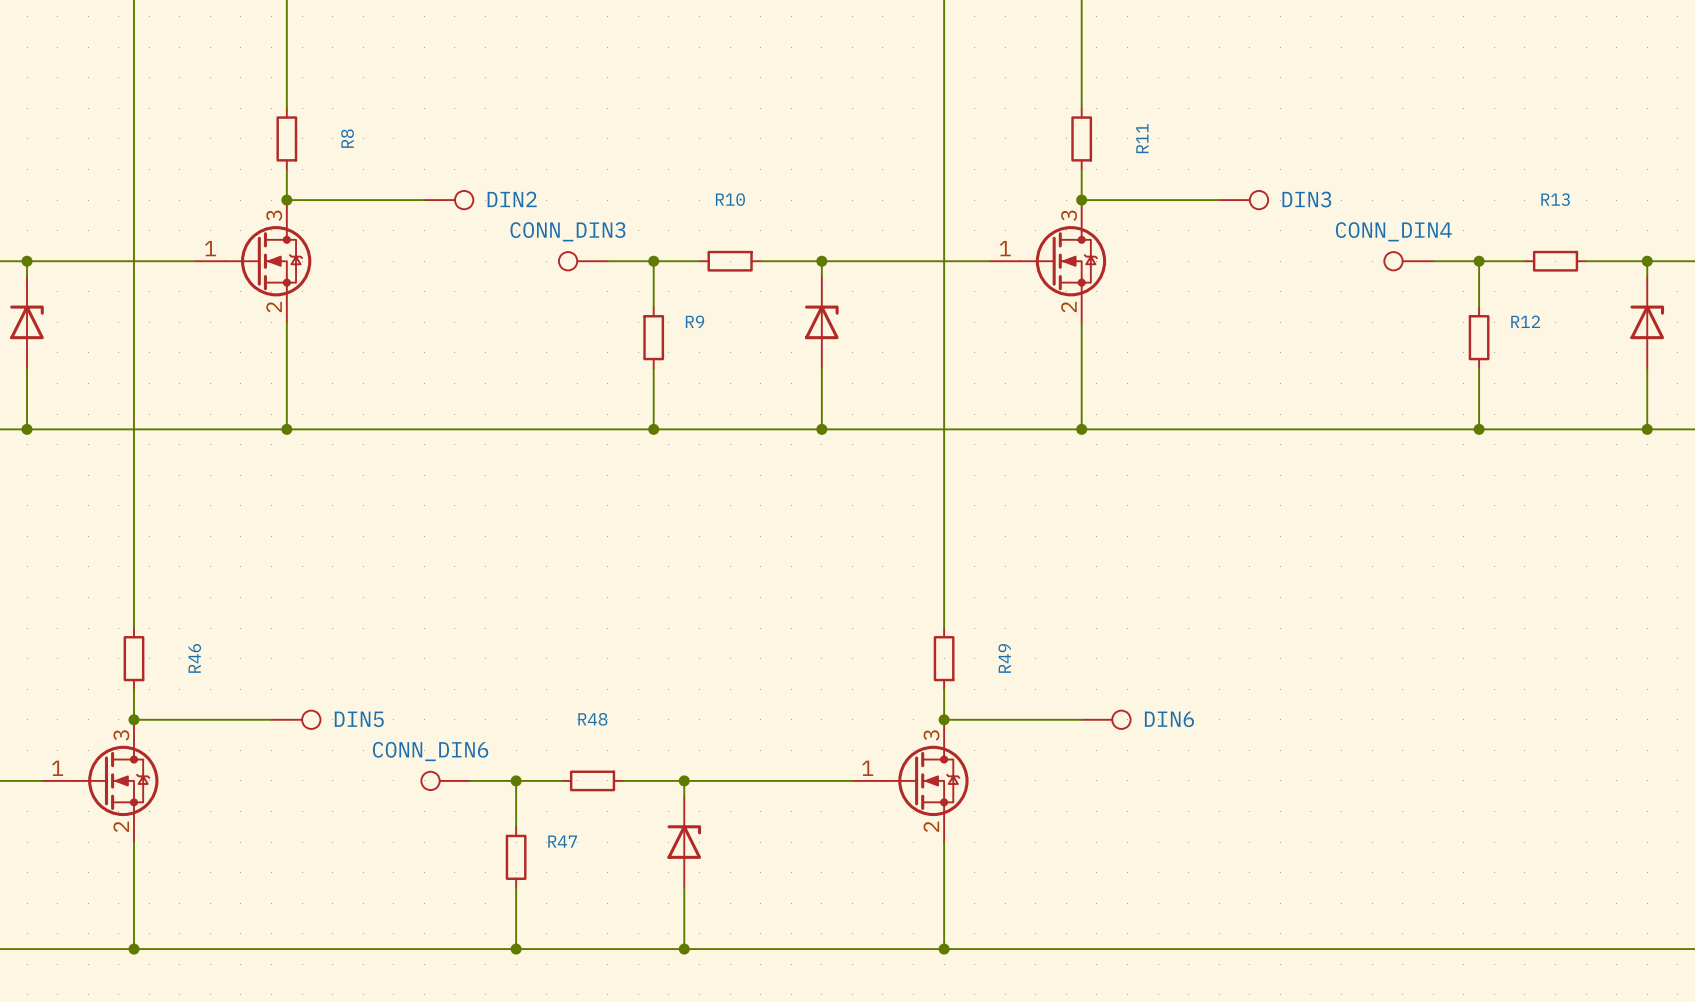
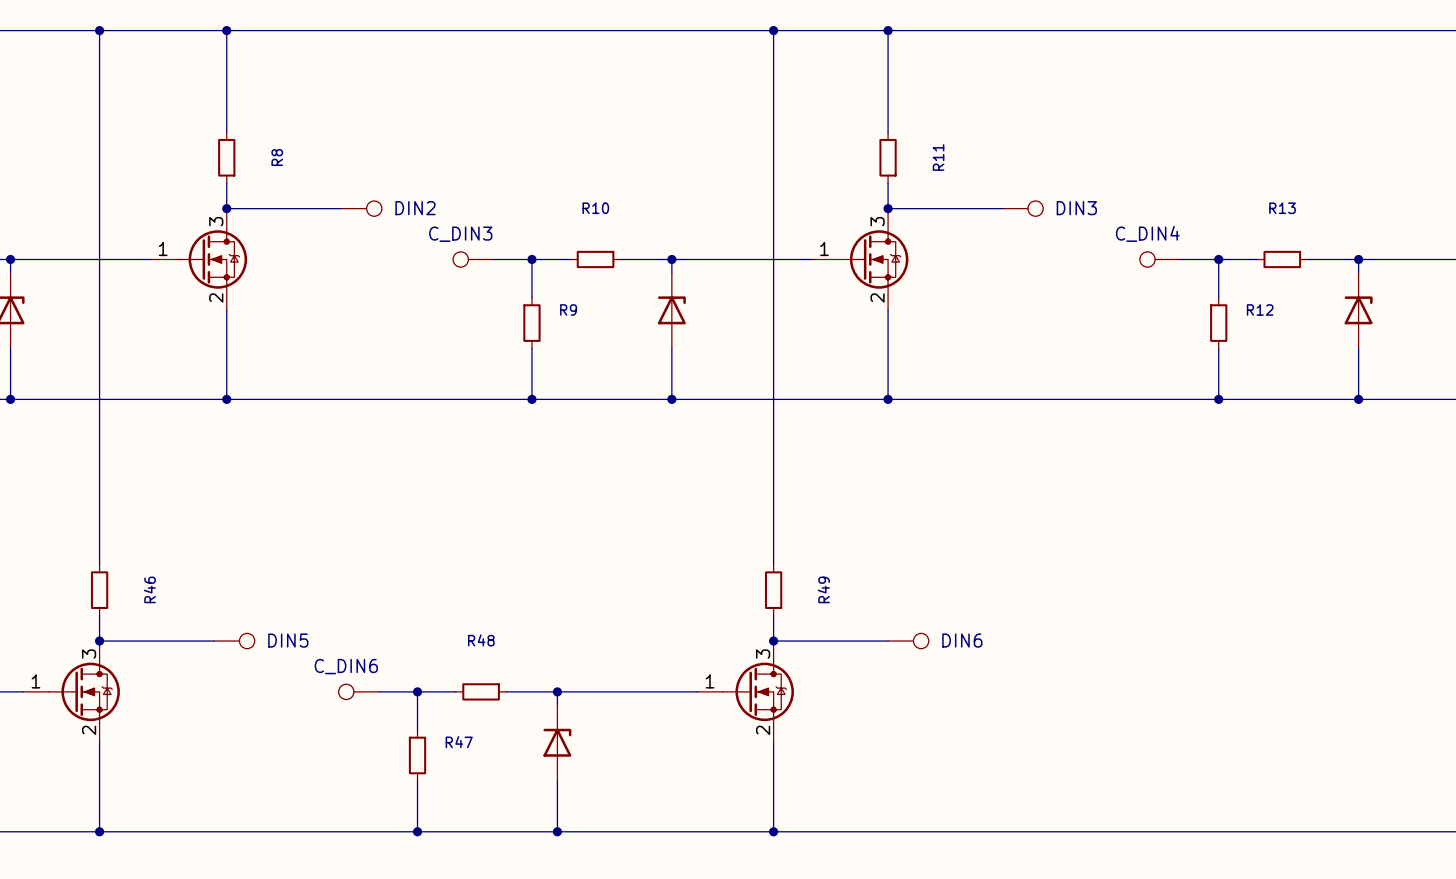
CONN_DIN3 name: CONN_DIN3 (567, 231) -> C_DIN3 (460, 234)
CONN_DIN4 name: CONN_DIN4 (1393, 231) -> C_DIN4 (1147, 233)
CONN_DIN6 name: CONN_DIN6 (430, 751) -> C_DIN6 (346, 666)

